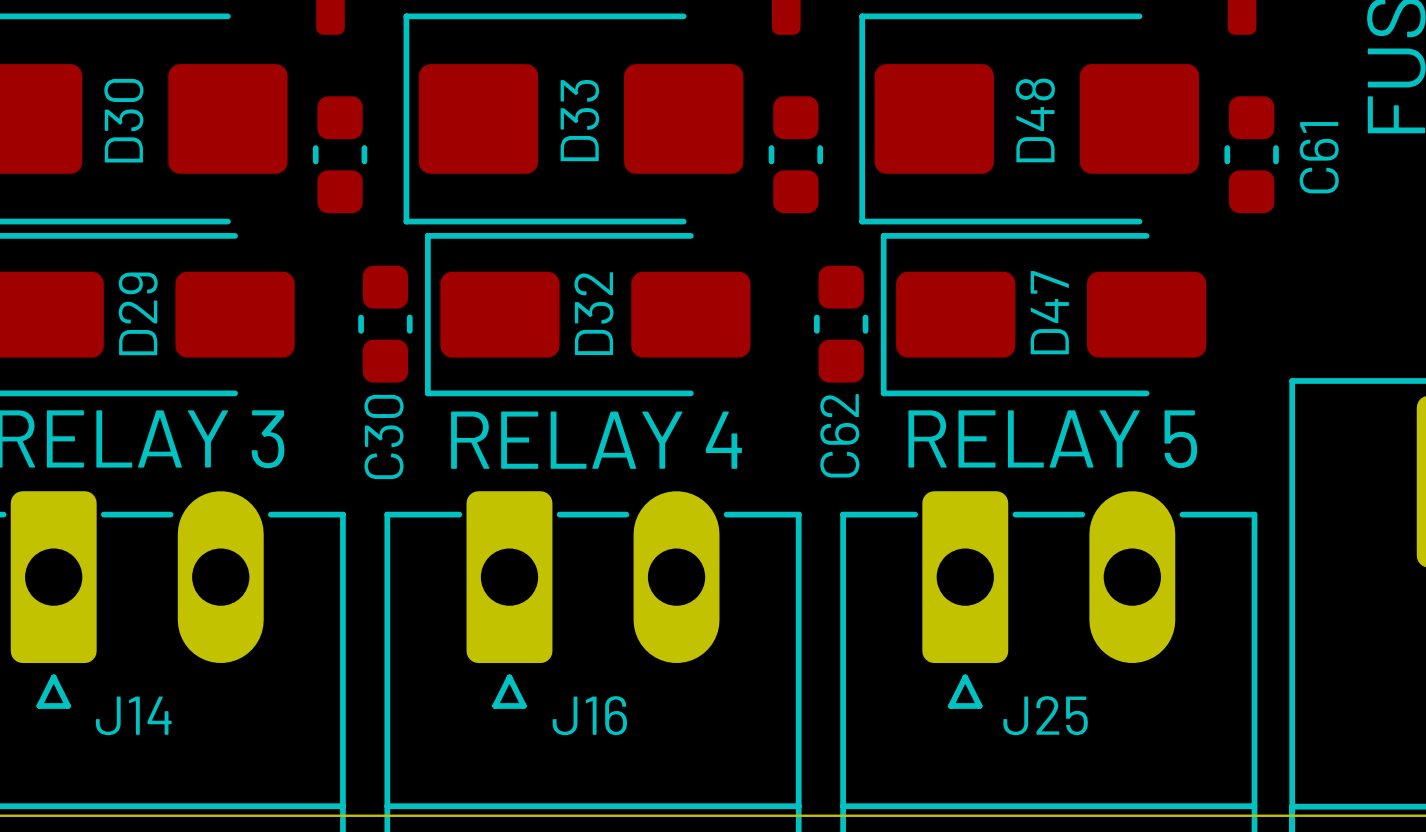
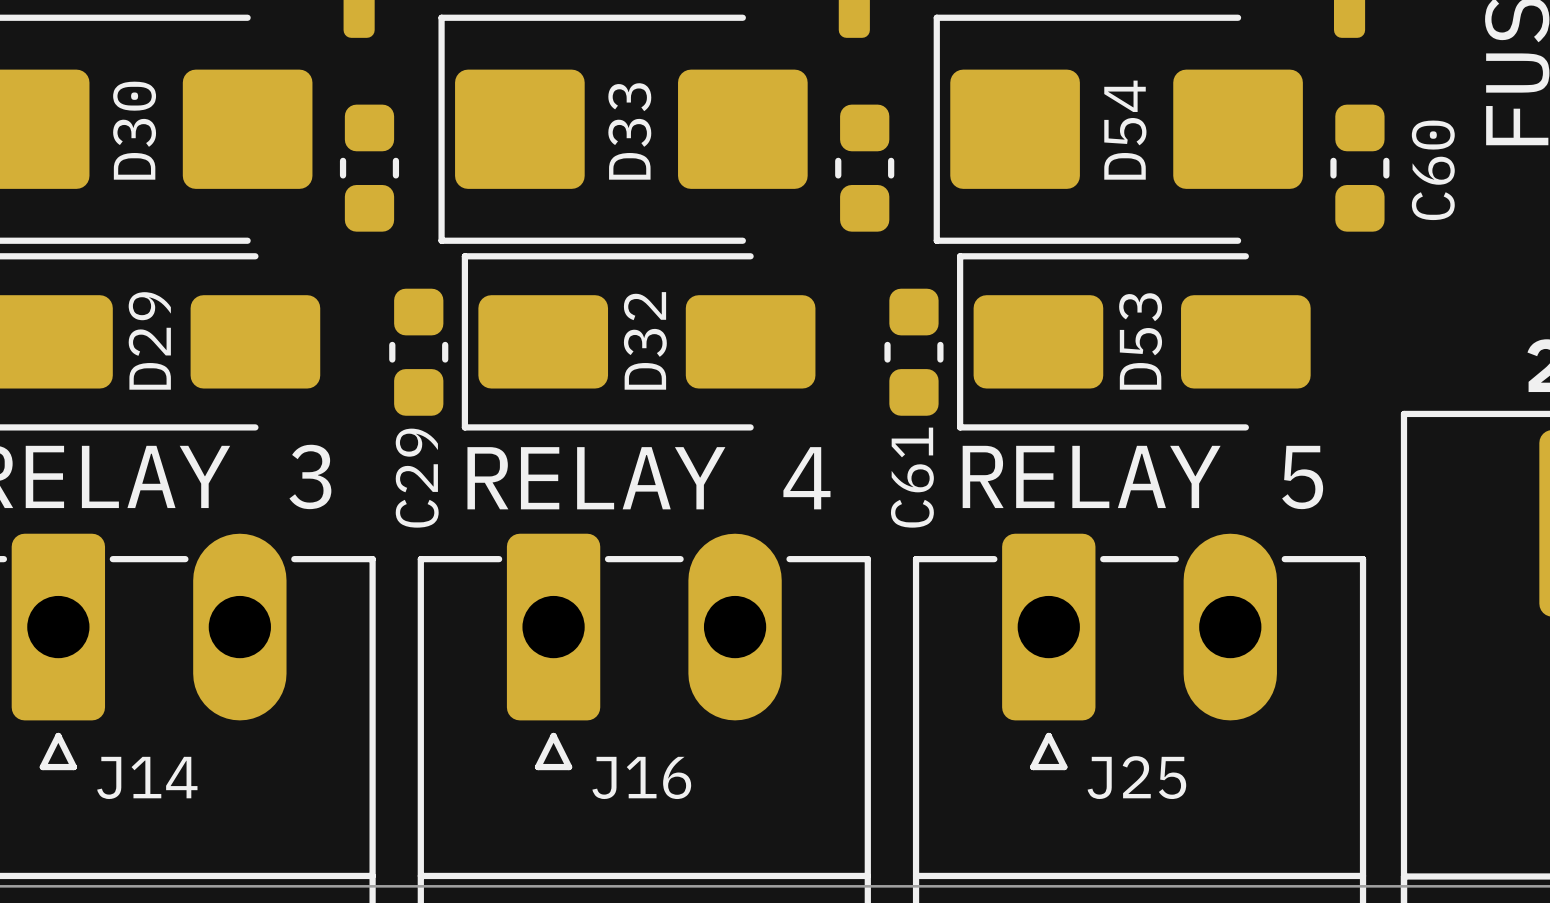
D48 name: D48 (1035, 120) -> D54 (1125, 130)
C61 name: C61 (1319, 157) -> C60 (1433, 170)
D47 name: D47 (1049, 312) -> D53 (1140, 341)
C62 name: C62 (839, 435) -> C61 (912, 477)
C30 name: C30 (384, 436) -> C29 (417, 478)

